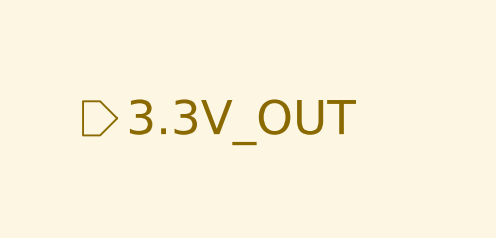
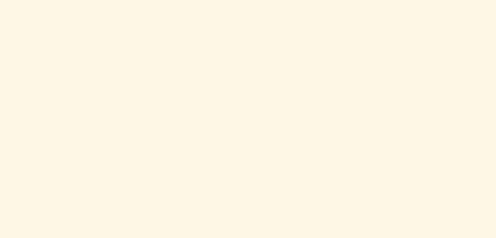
hierarchical label: 3.3V_OUT (242, 122) -> none

